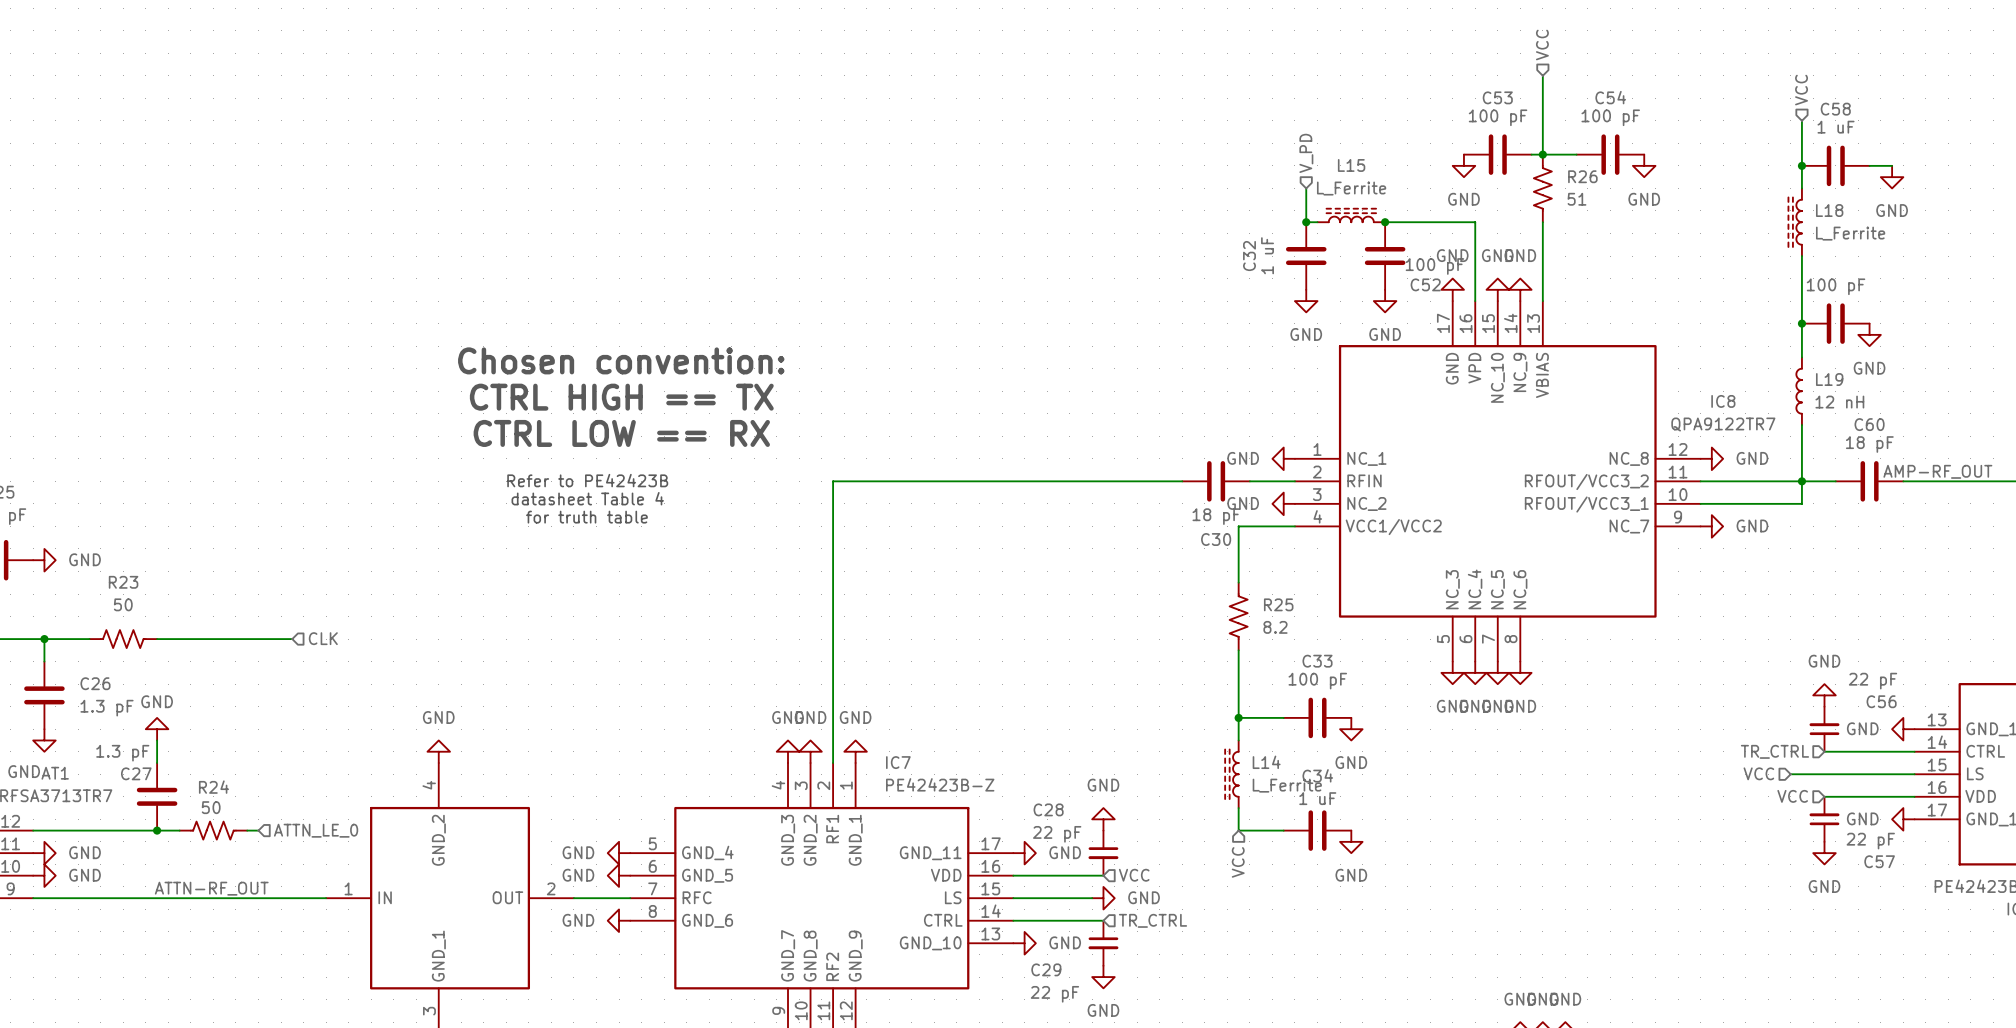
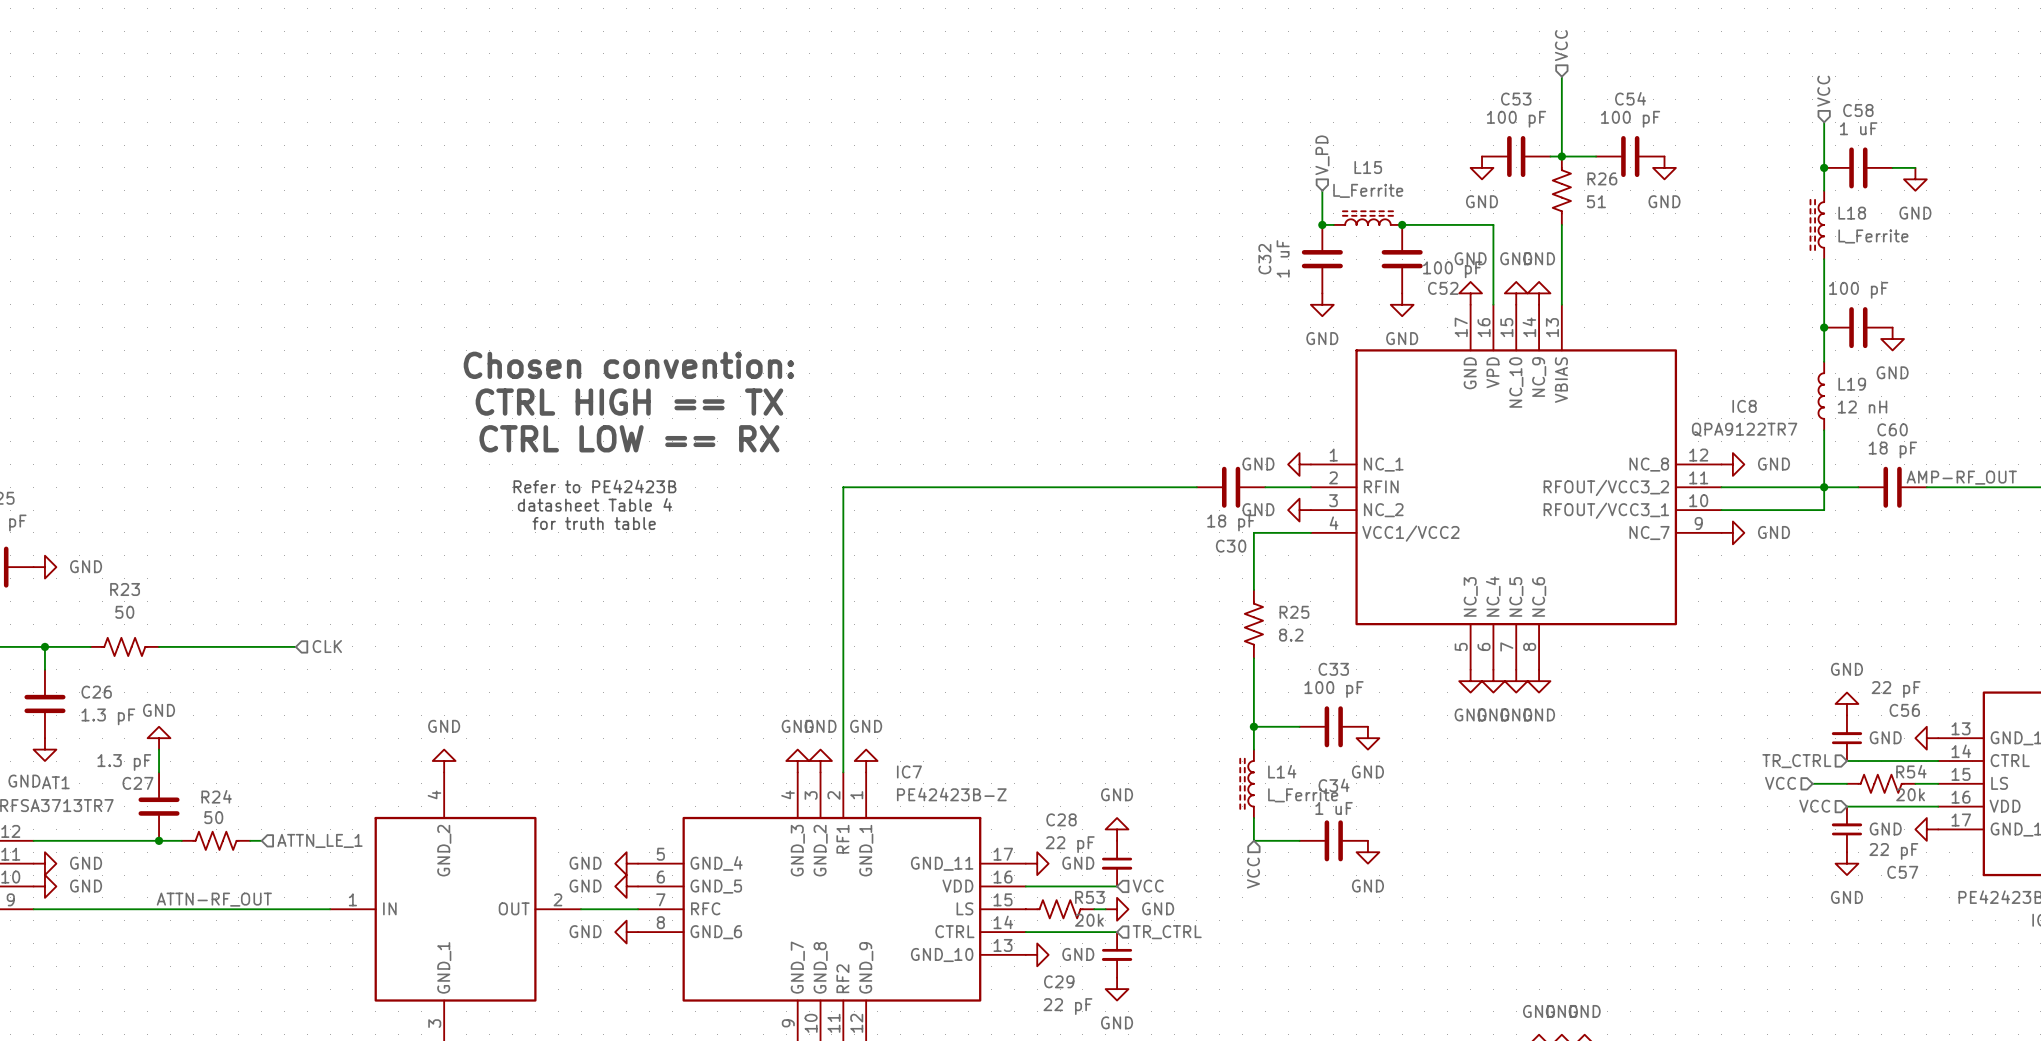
R54: none -> 20k (1881, 783)
hierarchical label: ATTN_LE_0 (316, 830) -> ATTN_LE_1 (319, 840)
R53: none -> 20k (1060, 909)

